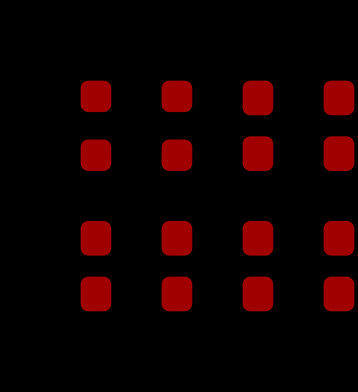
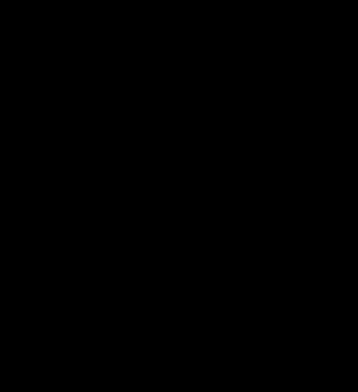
part: (95, 125) -> none
part: (176, 125) -> none
part: (257, 125) -> none
part: (338, 125) -> none
part: (95, 266) -> none
part: (176, 266) -> none
part: (257, 266) -> none
part: (338, 266) -> none

